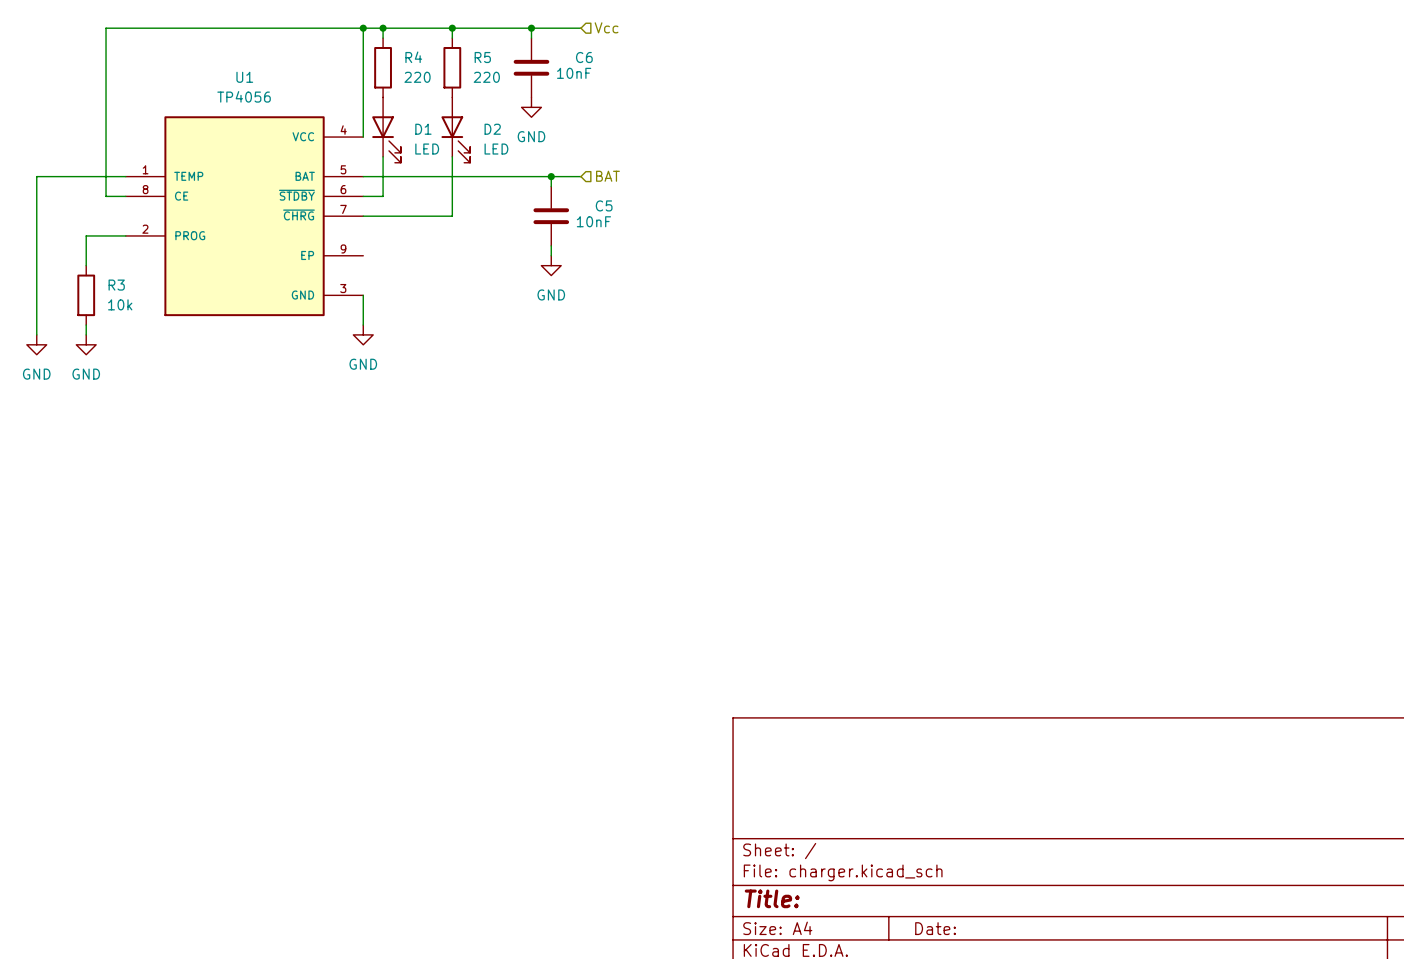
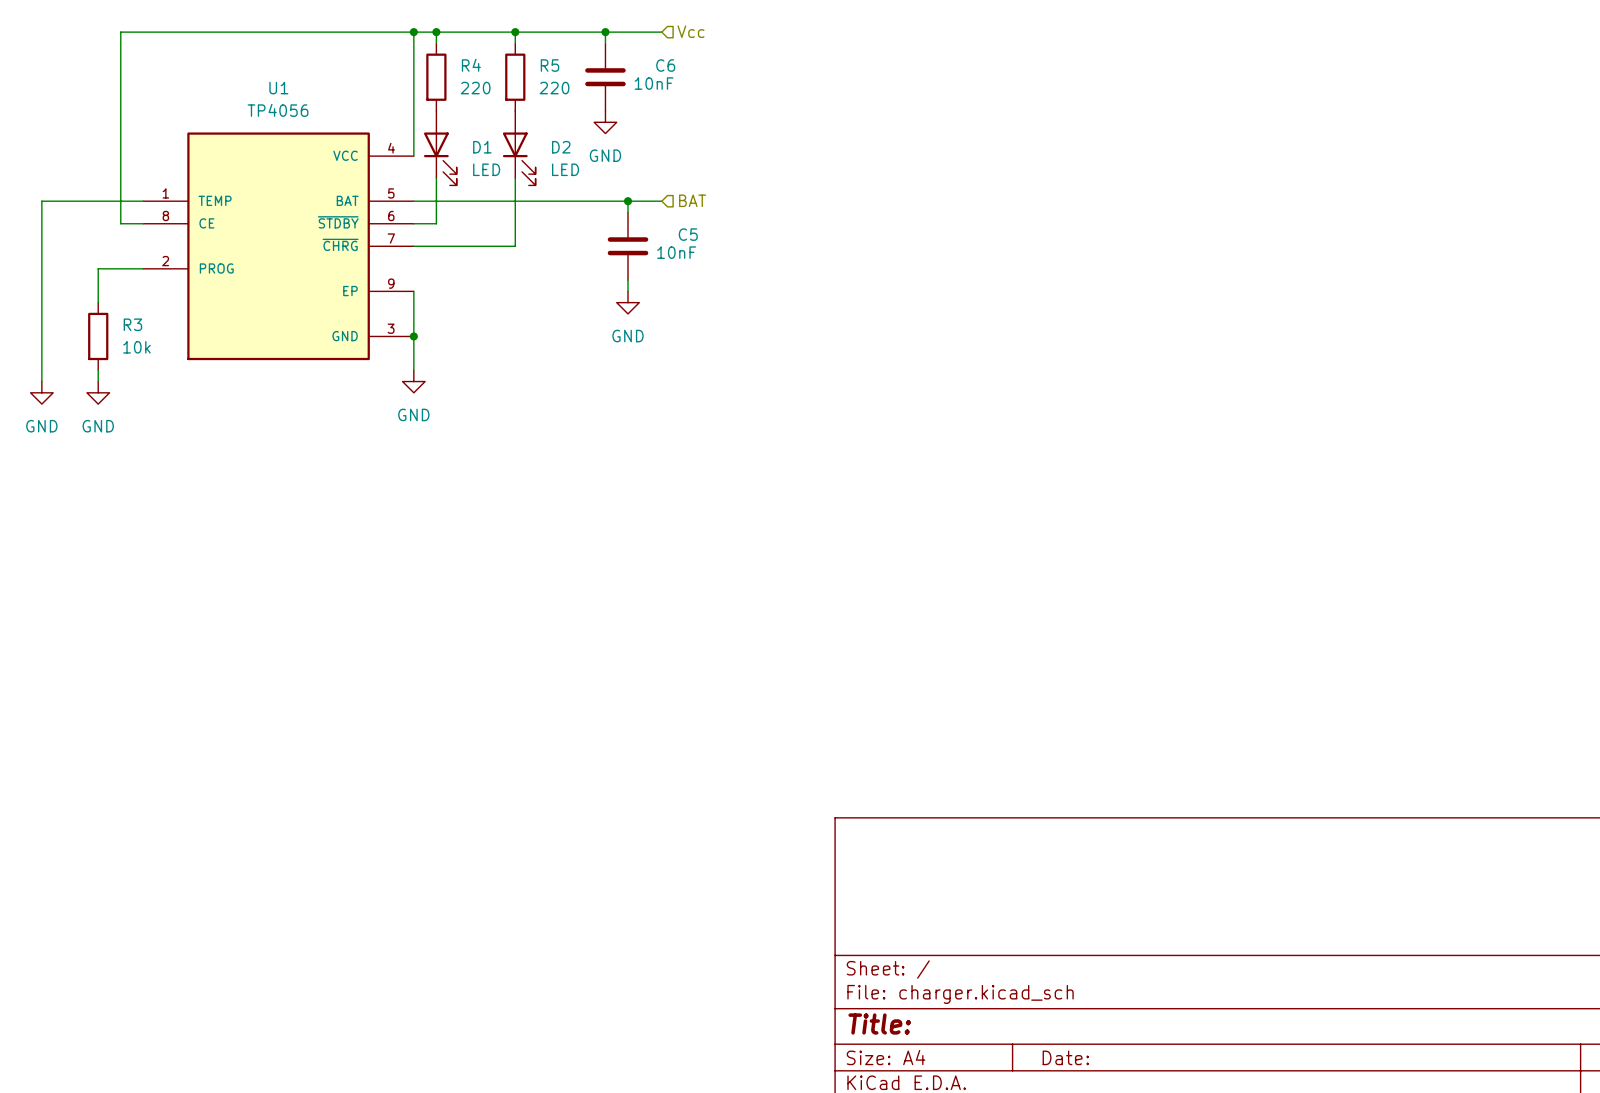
wire: none -> (413, 291) (413, 336)
junction: none -> (413, 336)

